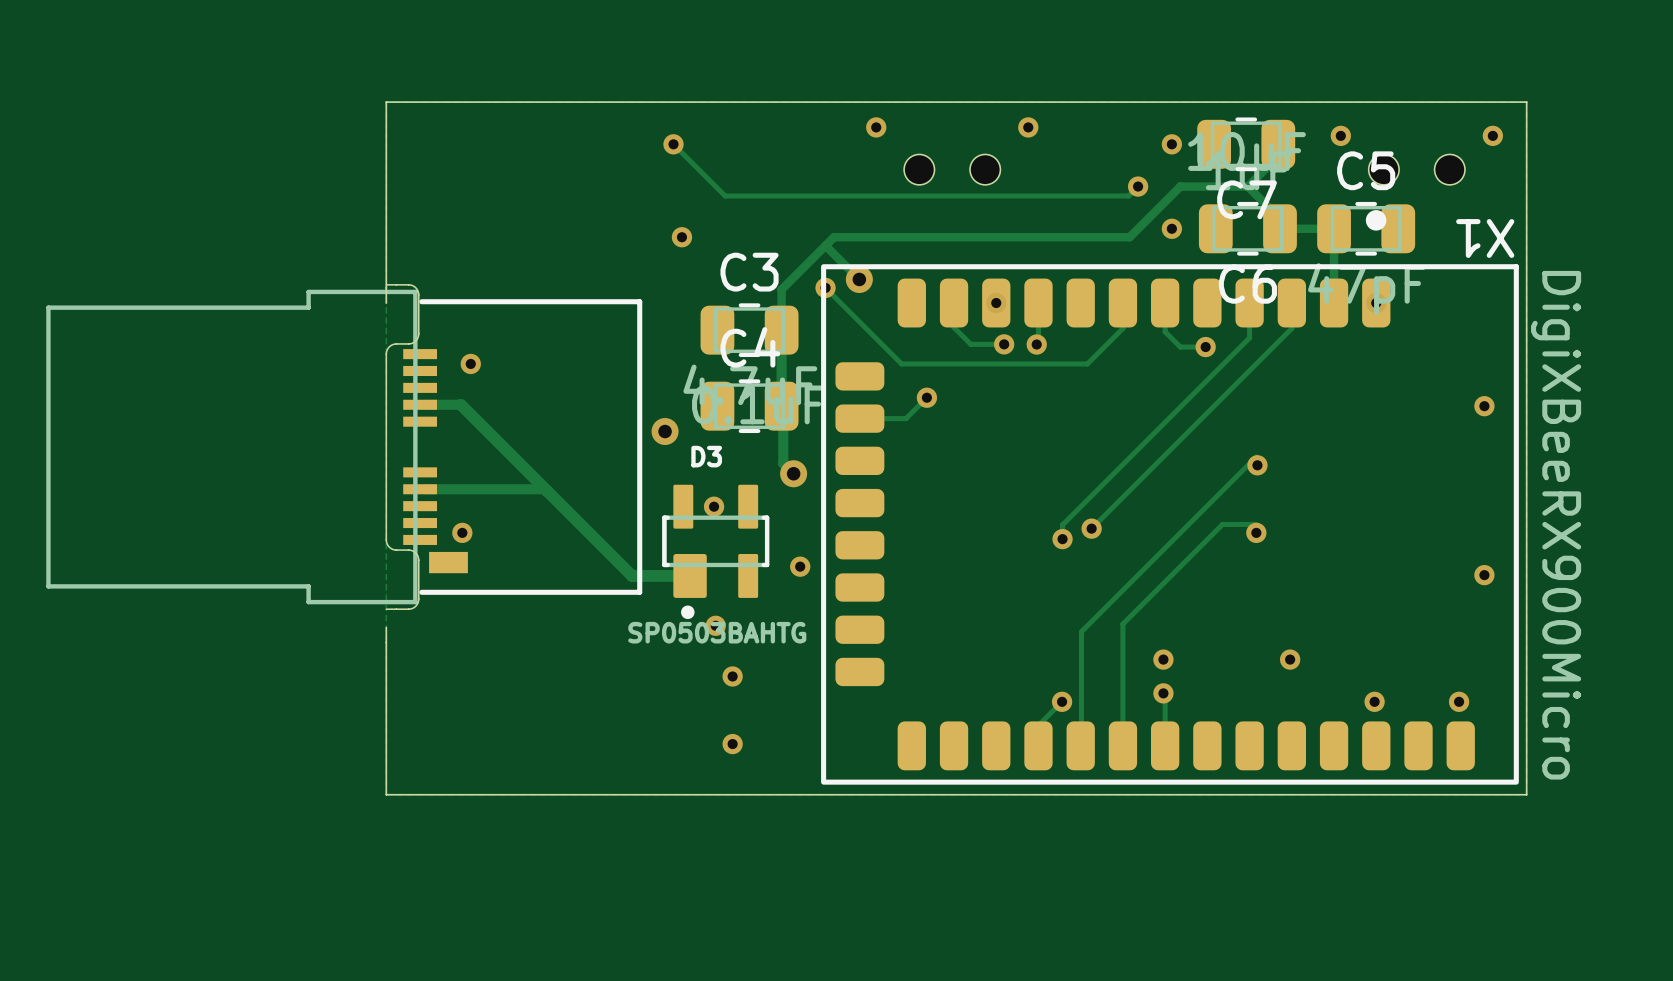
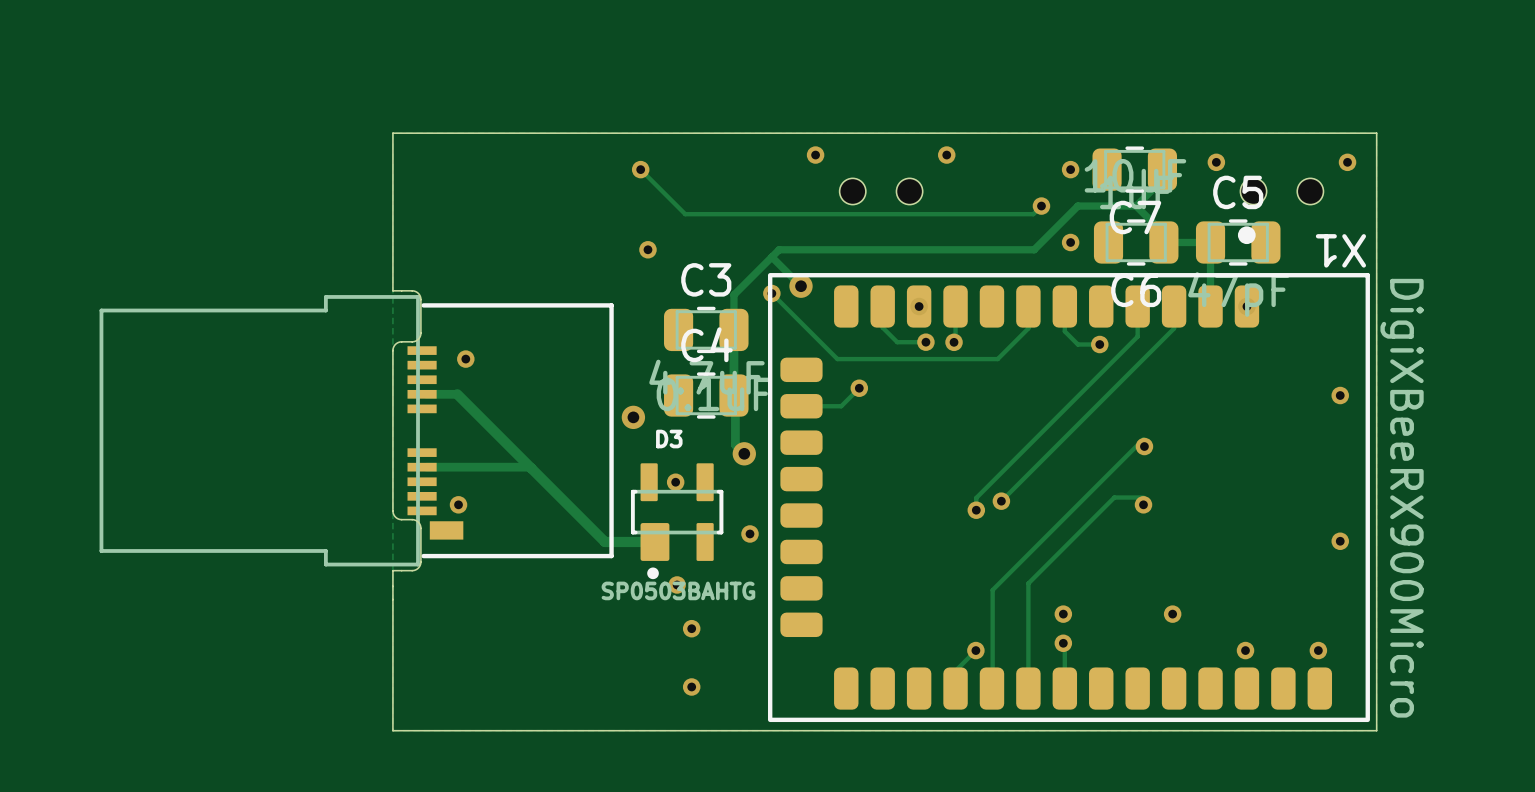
board edge: (386, 284) (386, 303) -> (392, 570) (392, 586)

